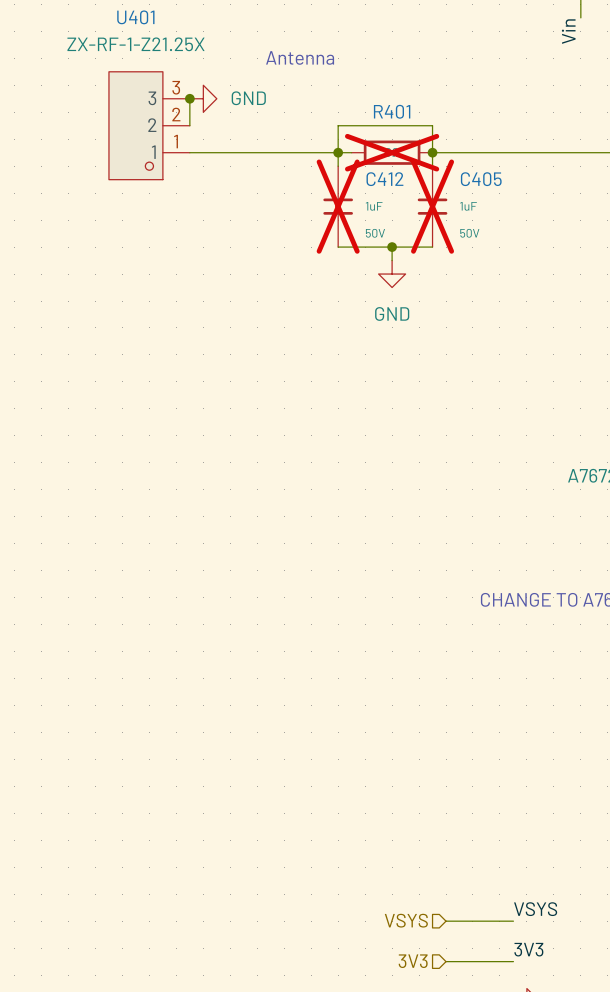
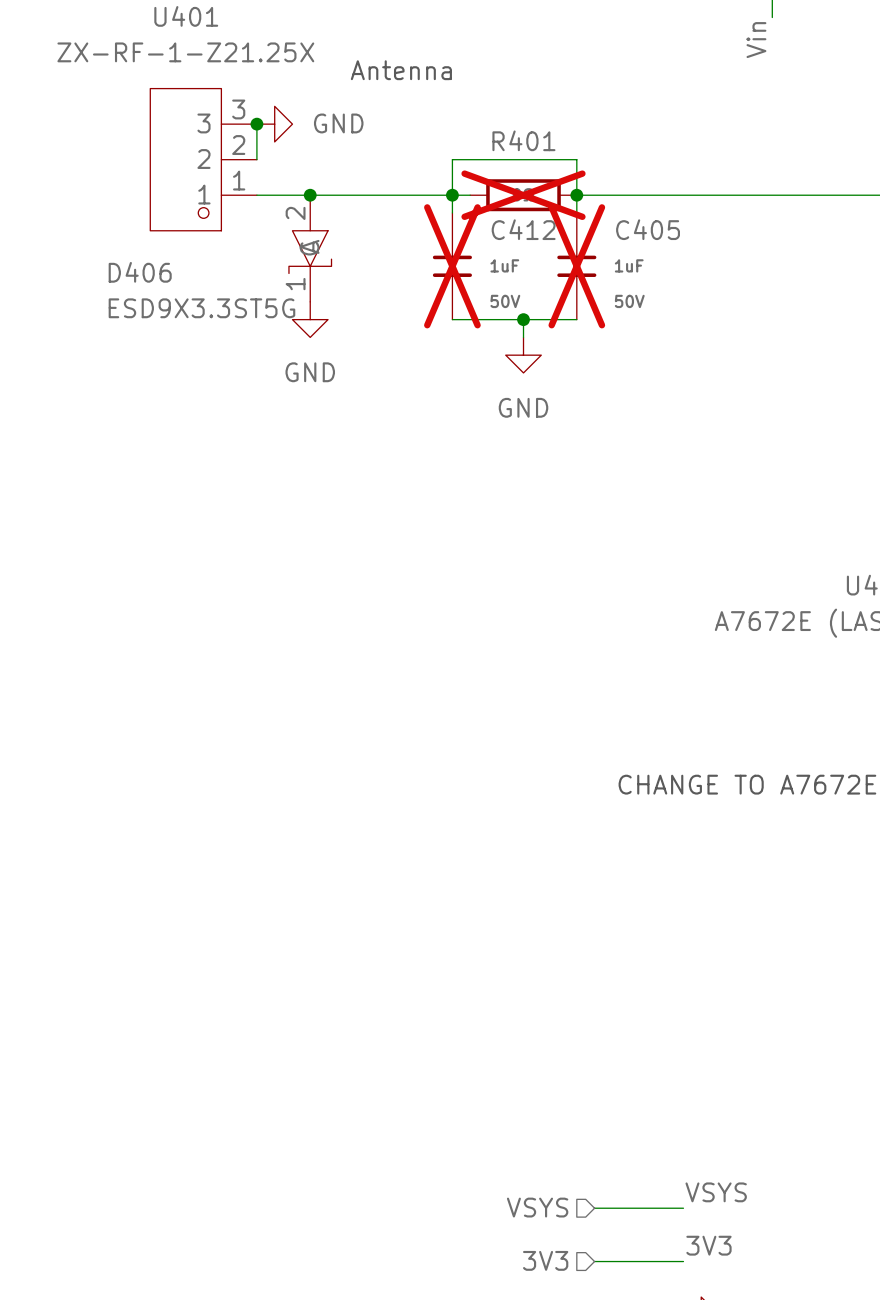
junction: none -> (310, 195)
D406: none -> ESD9X3.3ST5G (310, 248)
power symbol: none -> GND (310, 319)

